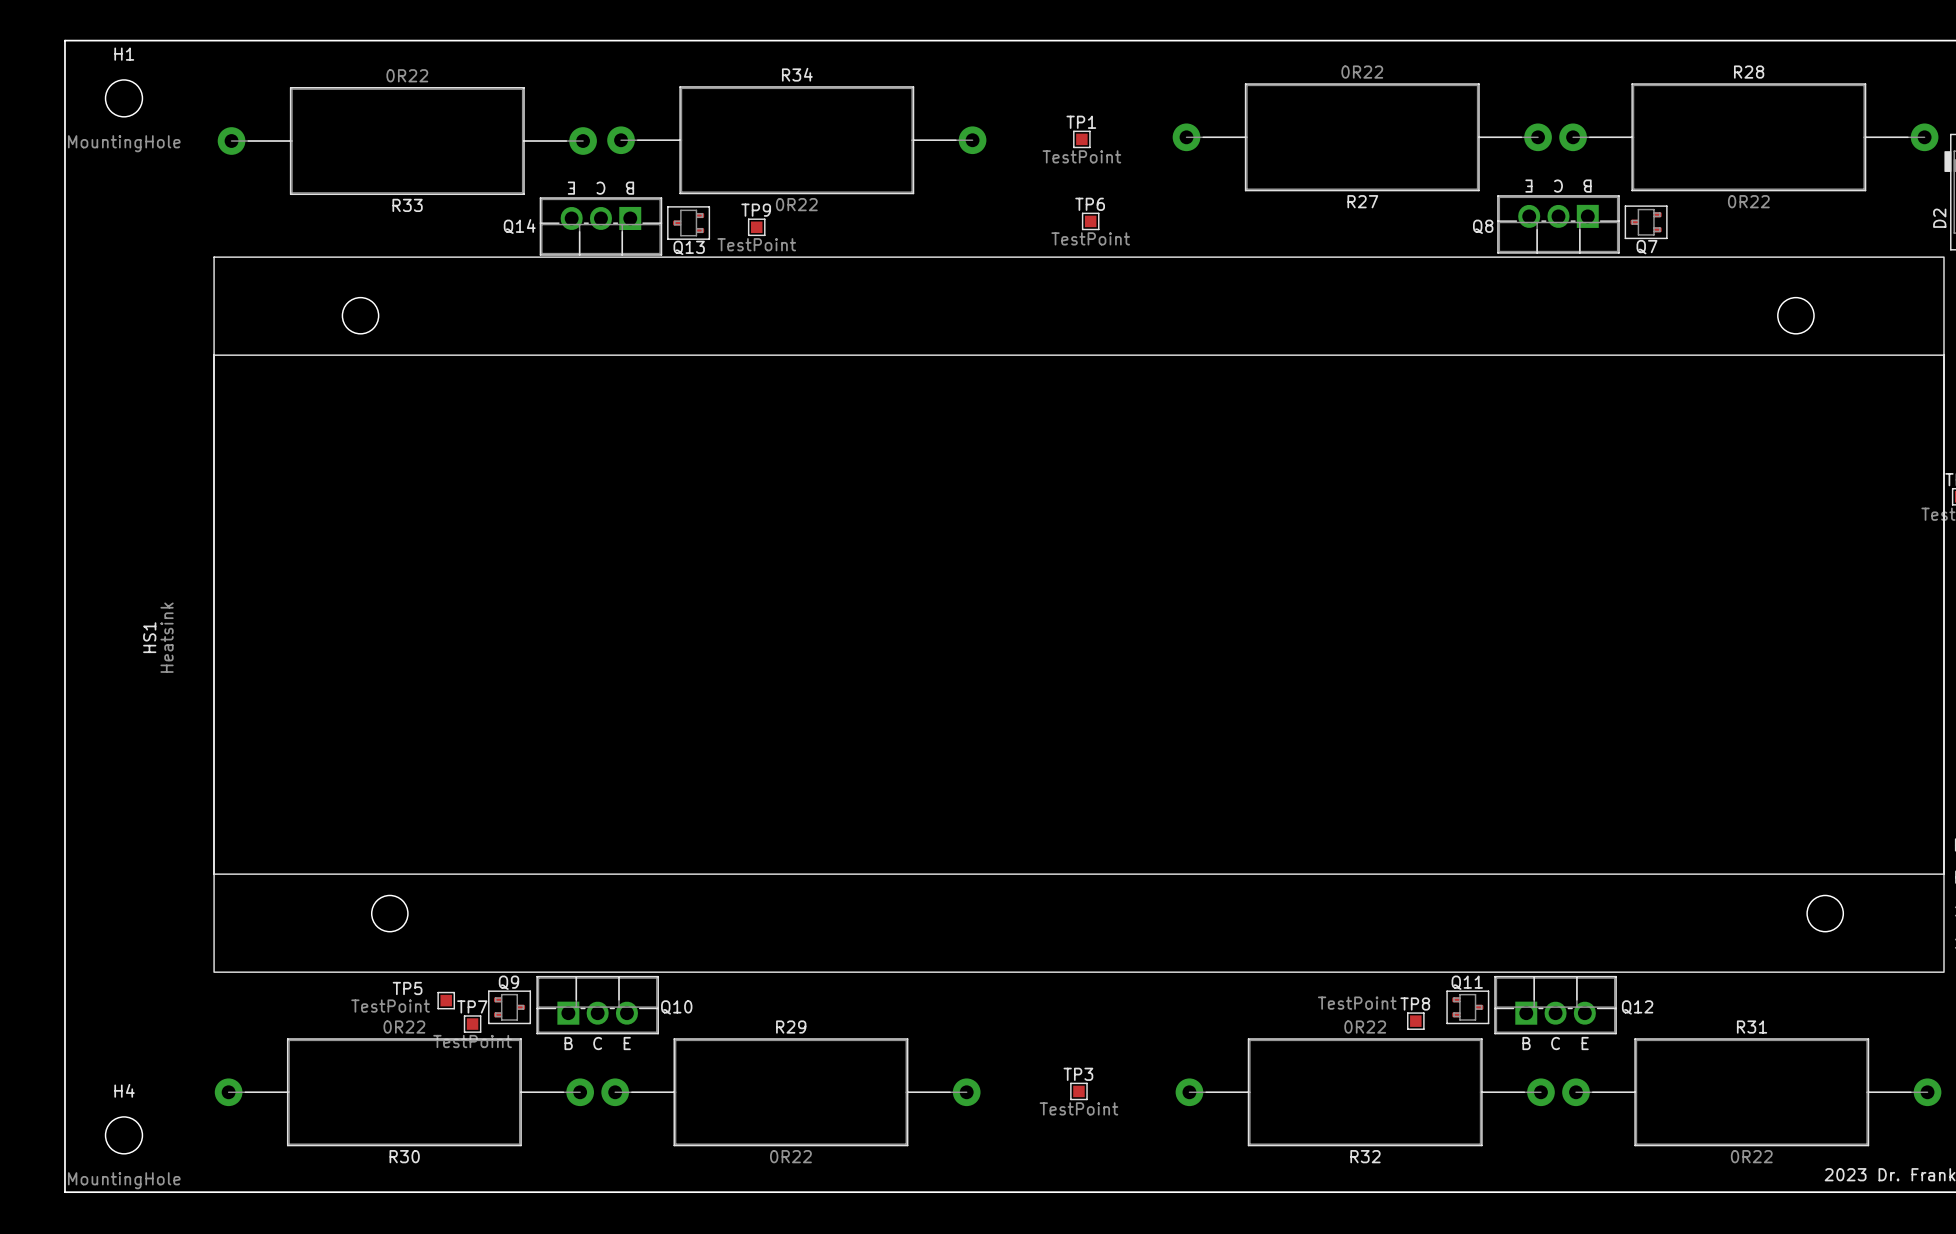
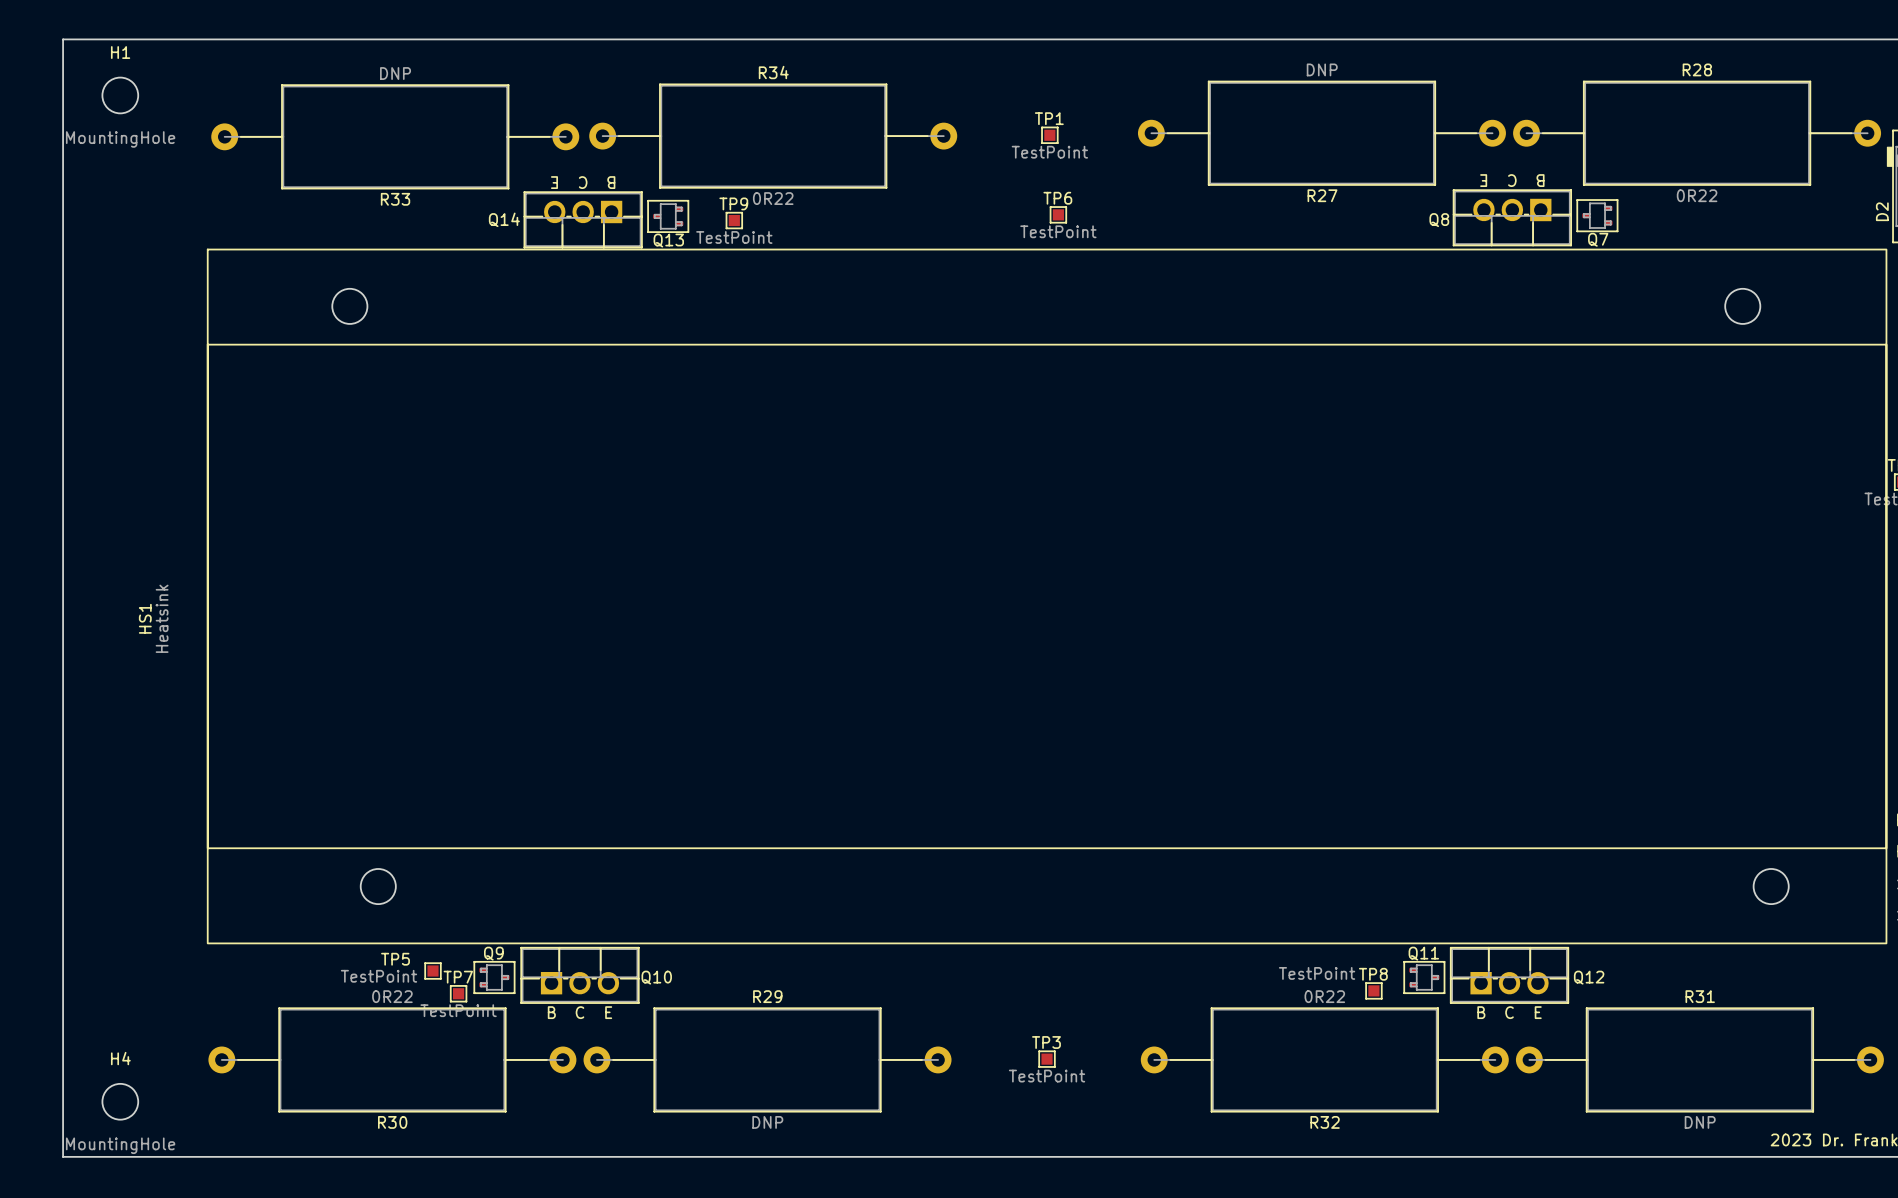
R27 value: 0R22 (1362, 72) -> DNP (1322, 69)
R33 value: 0R22 (407, 75) -> DNP (395, 73)
R29 value: 0R22 (790, 1156) -> DNP (767, 1122)
R31 value: 0R22 (1751, 1156) -> DNP (1700, 1122)

